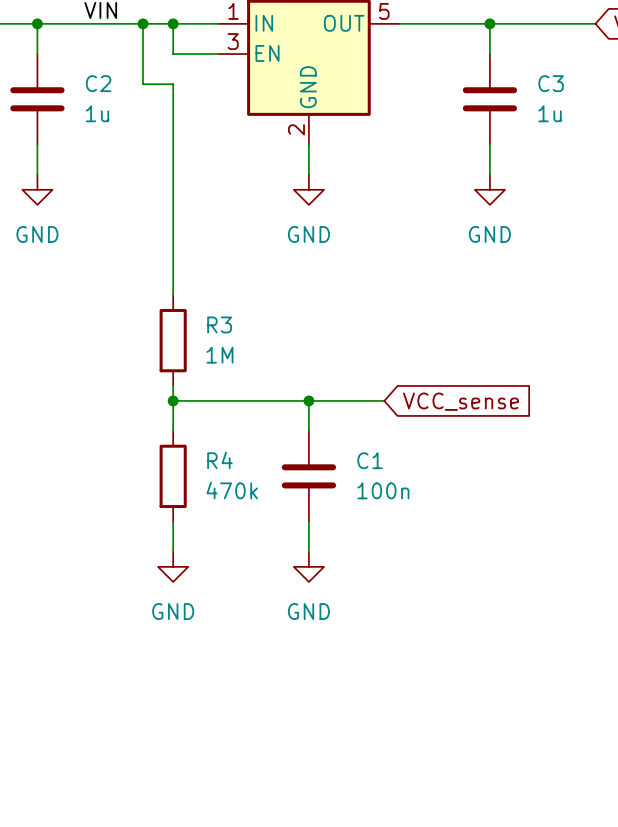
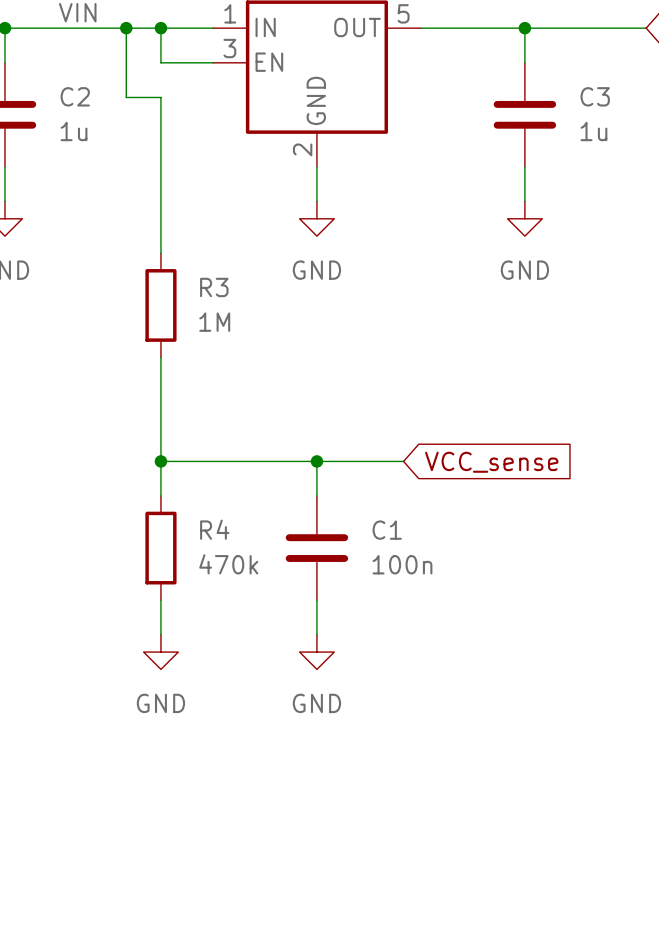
wire: (173, 219) (173, 295) -> (160, 357) (160, 444)
R3 position: (173, 340) -> (160, 305)

